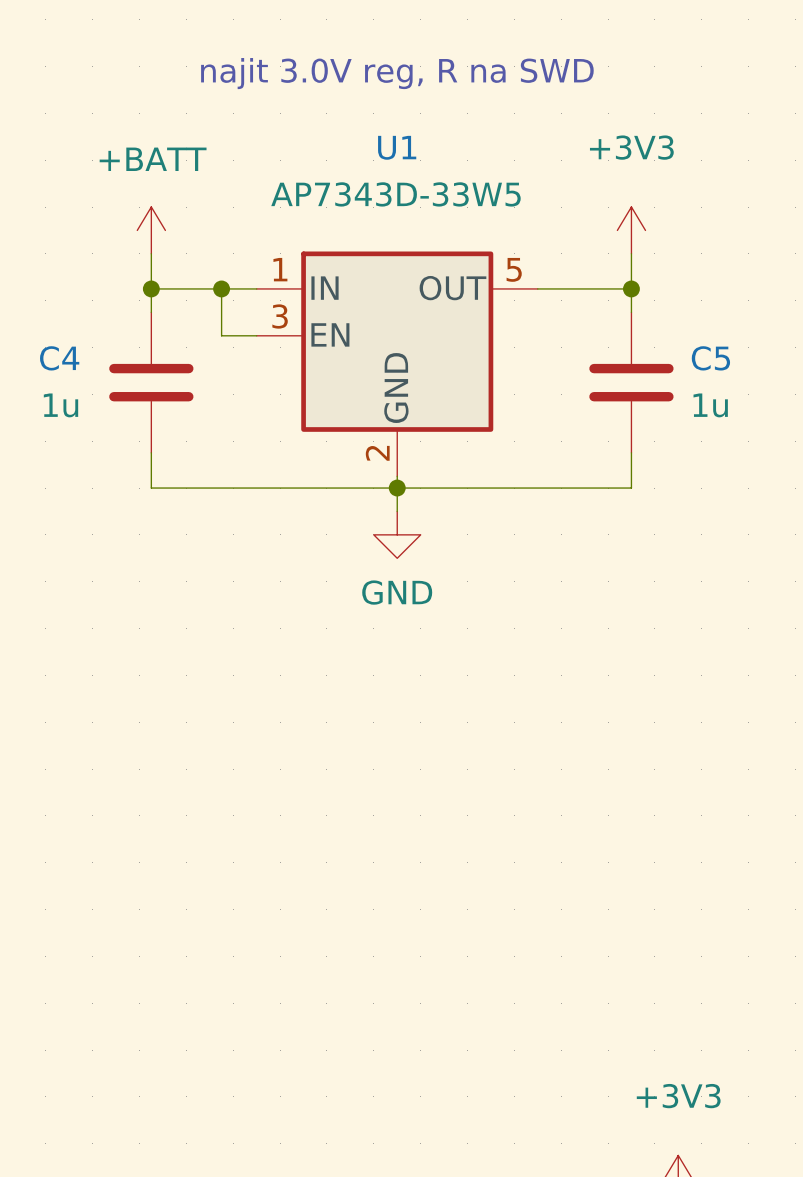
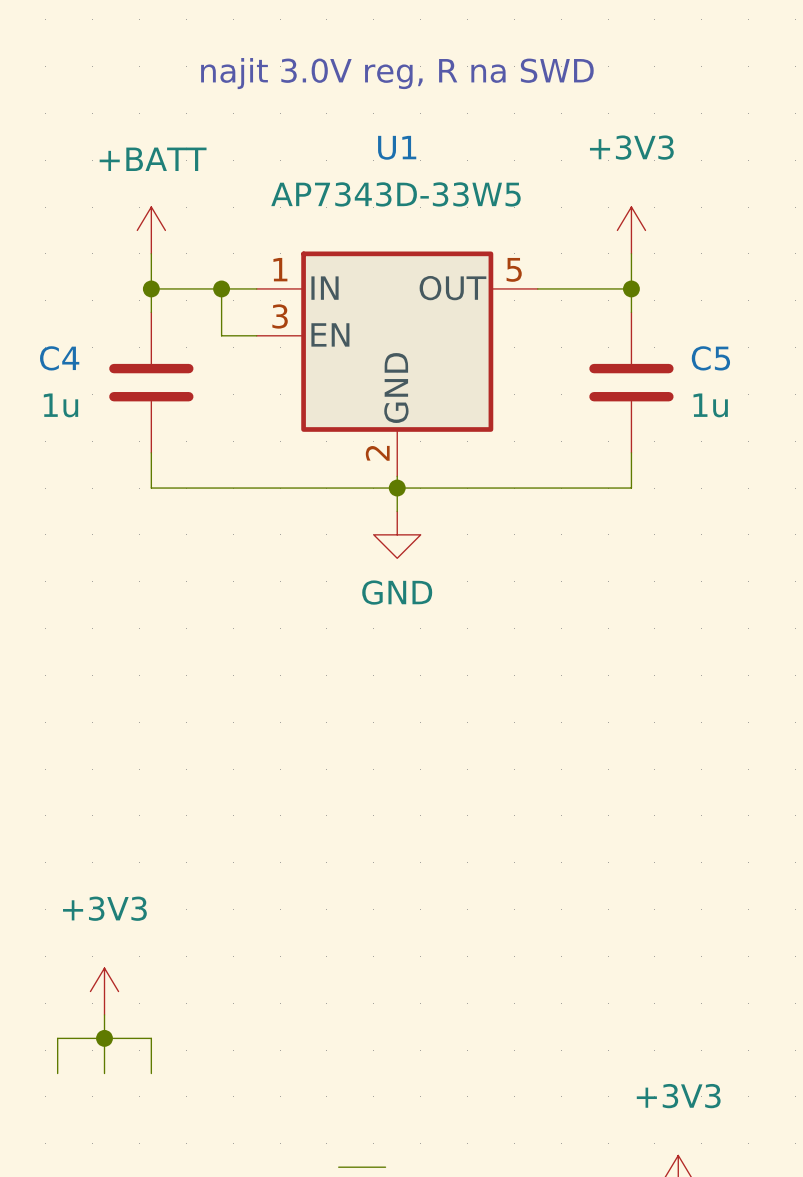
power symbol: none -> +3V3 (104, 991)
wire: none -> (104, 1014) (104, 1073)
junction: none -> (104, 1038)
wire: none -> (57, 1073) (57, 1038) (151, 1038) (151, 1073)
wire: none -> (338, 1167) (385, 1167)

